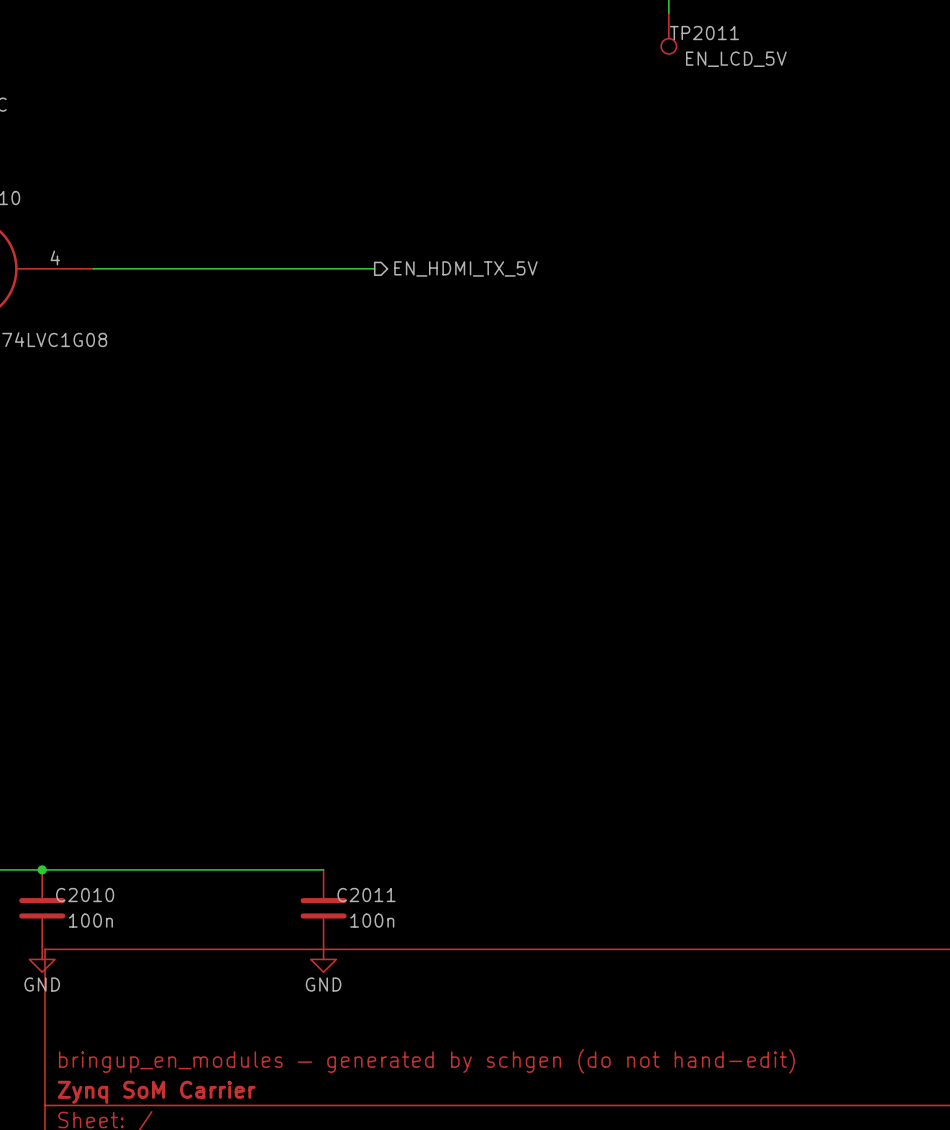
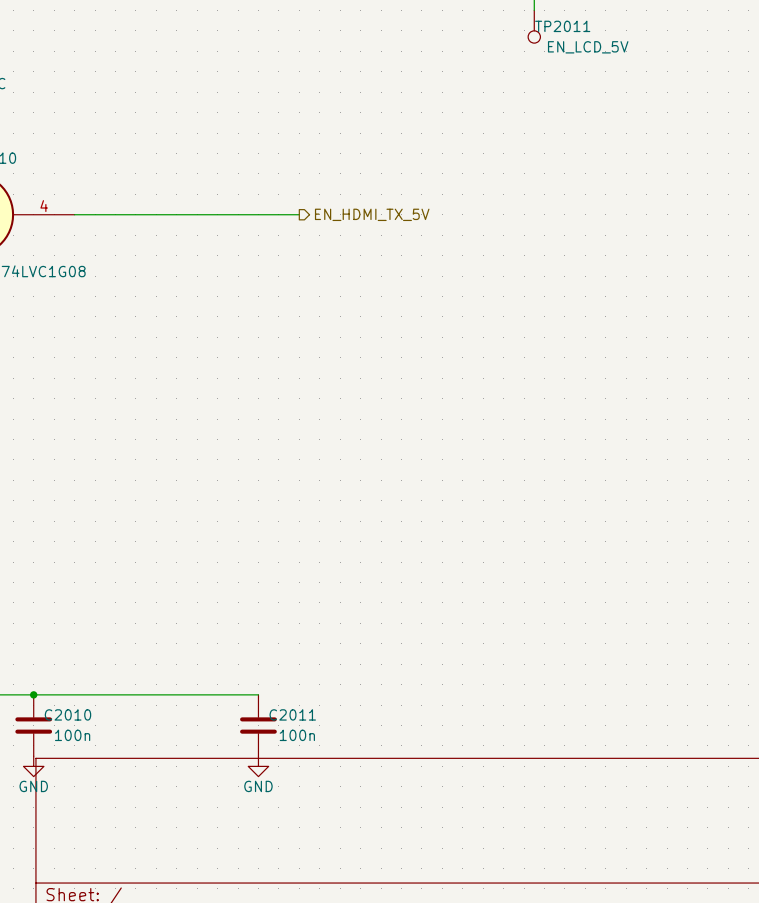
title block: bringup_en_modules — generated by schgen (do not hand-edit) (426, 1061) -> none
title block: Zynq SoM Carrier (156, 1092) -> none

